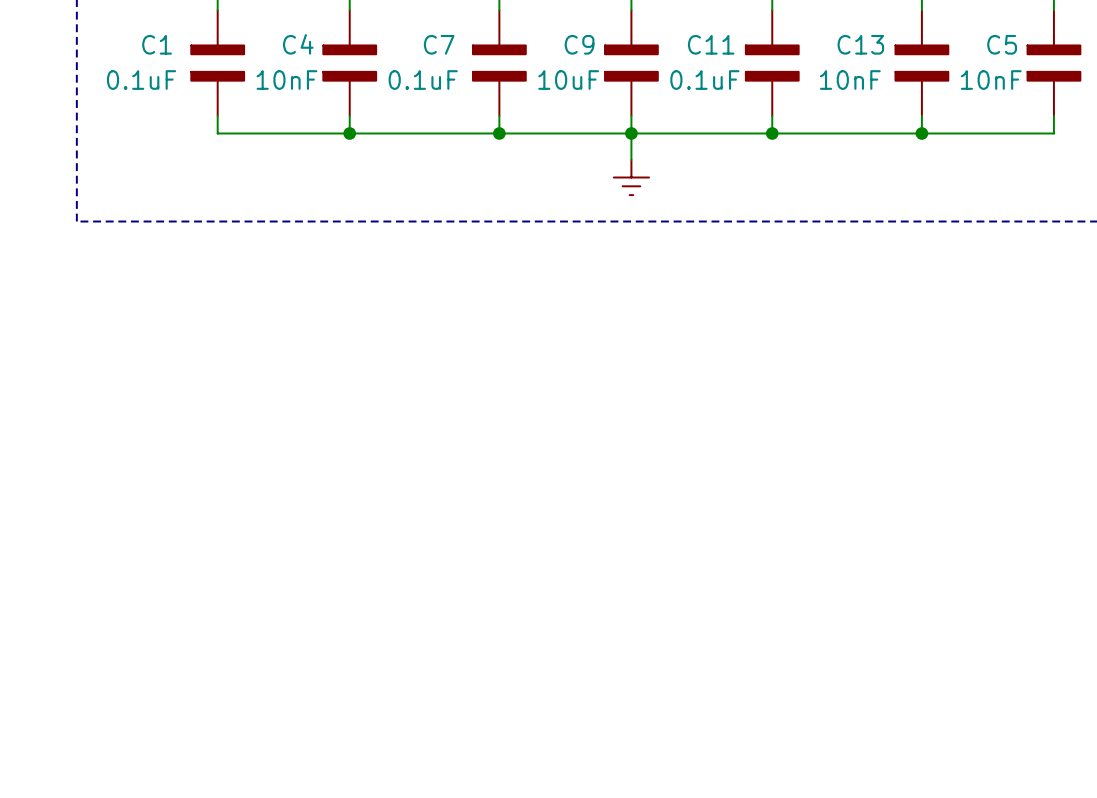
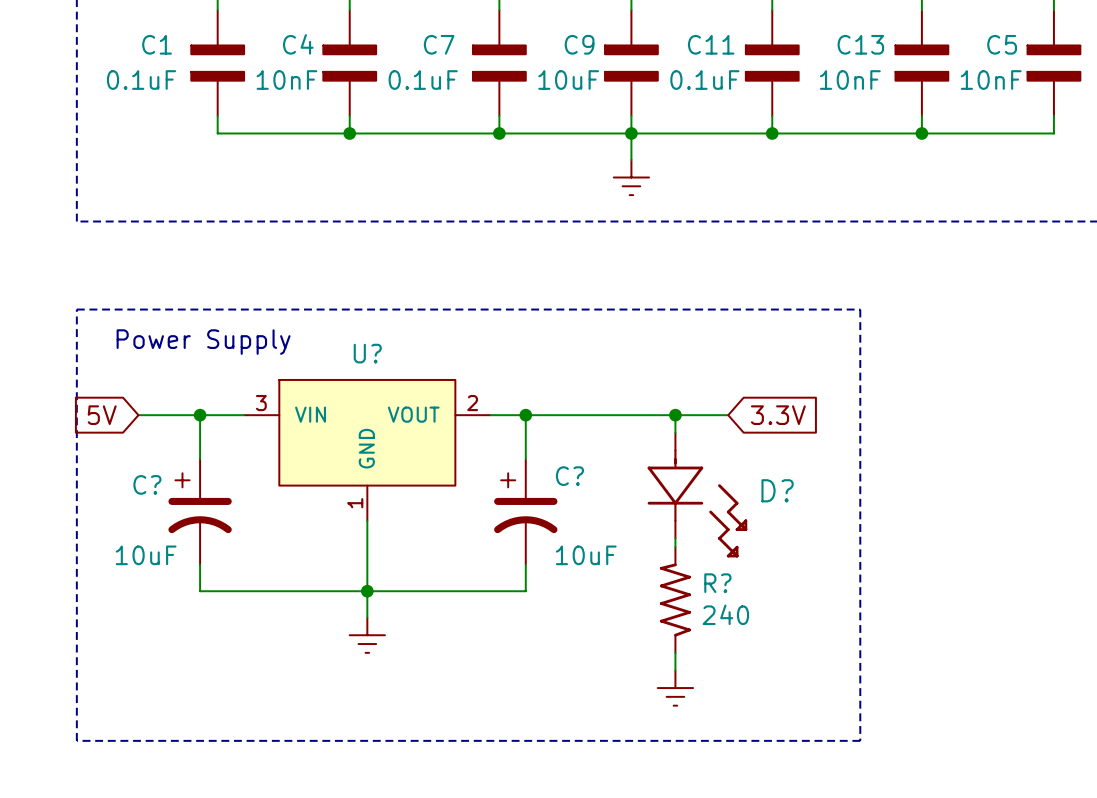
line: none -> (76, 309) (860, 309) (860, 740) (76, 740) (76, 309)
text: none -> Power Supply (203, 342)
global label: none -> 5V (102, 415)
wire: none -> (138, 415) (244, 415)
wire: none -> (200, 415) (200, 459)
junction: none -> (200, 415)
wire: none -> (490, 415) (728, 415)
wire: none -> (525, 415) (525, 459)
junction: none -> (525, 415)
wire: none -> (675, 415) (675, 432)
junction: none -> (675, 415)
global label: none -> 3.3V (778, 415)
U?: none -> (367, 450)
D?: none -> (697, 495)
C?: none -> 10uF (200, 512)
C?: none -> 10uF (525, 512)
wire: none -> (367, 520) (367, 617)
wire: none -> (675, 538) (675, 547)
wire: none -> (200, 564) (200, 591) (525, 591) (525, 564)
junction: none -> (367, 591)
R?: none -> 240 (675, 600)
power symbol: none -> (367, 635)
wire: none -> (675, 652) (675, 670)
power symbol: none -> (675, 688)

